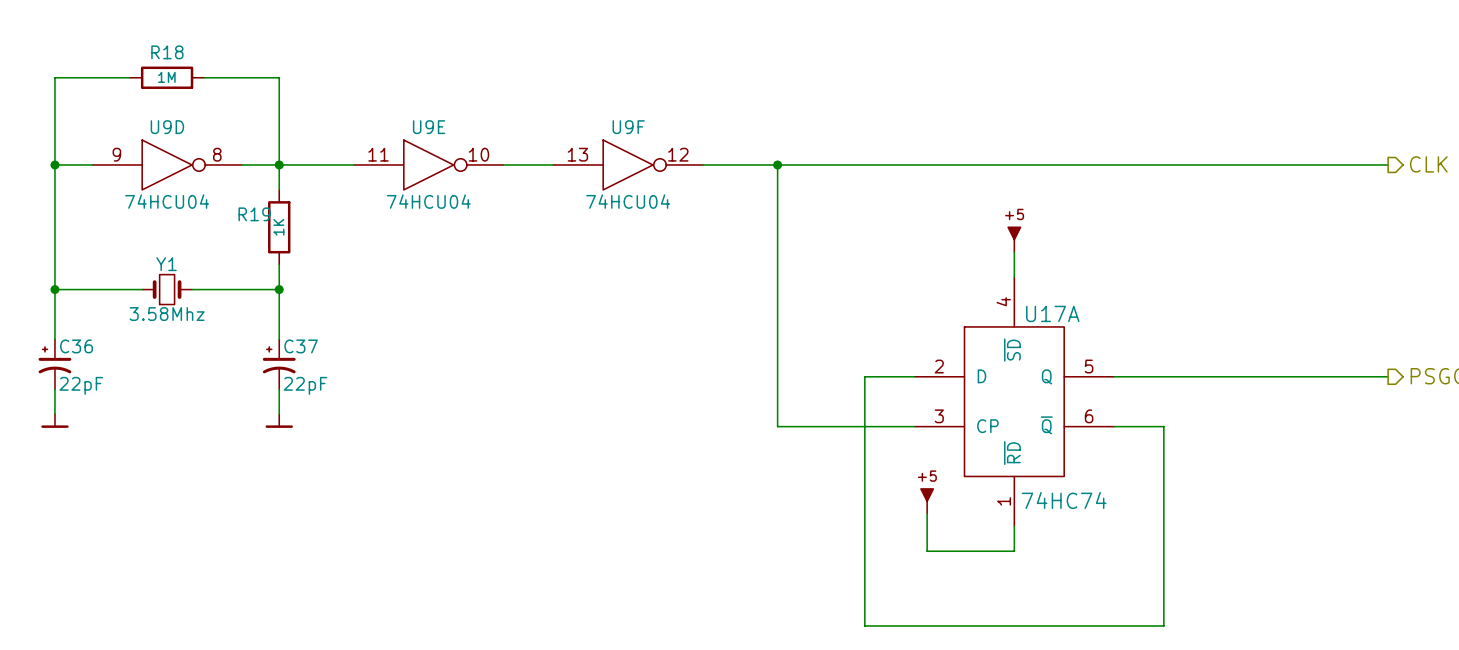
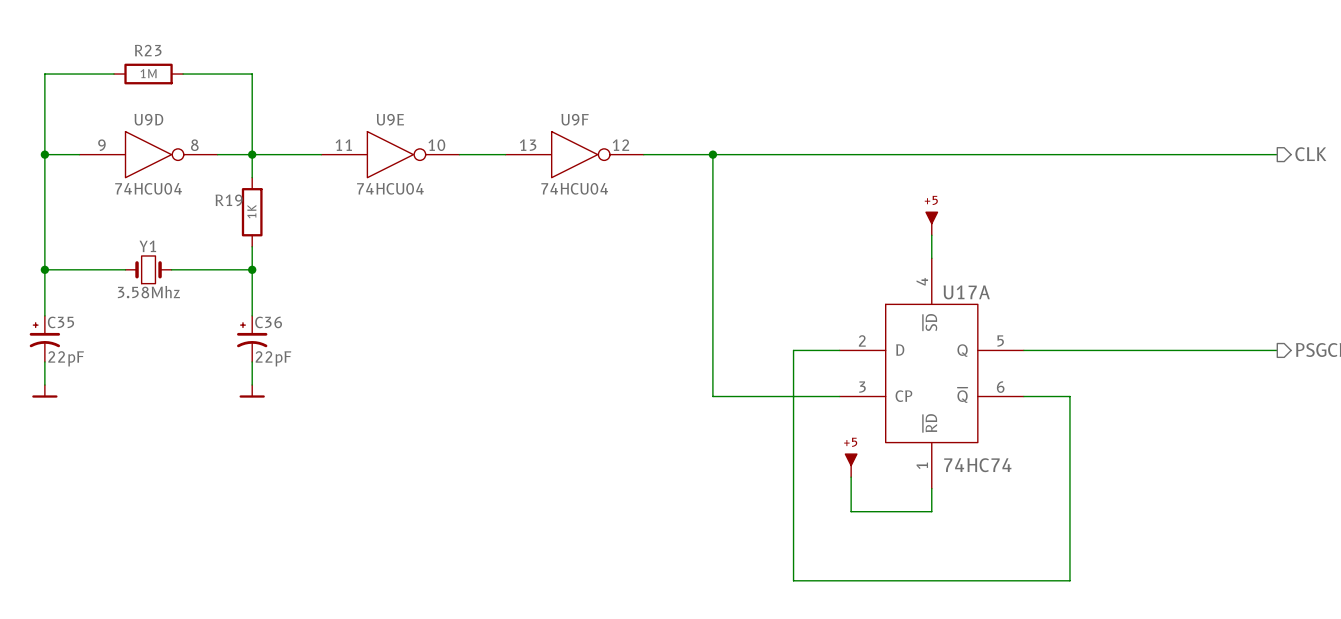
R18 name: R18 (167, 52) -> R23 (148, 50)
C36 name: C36 (76, 346) -> C35 (60, 322)
C37 name: C37 (301, 346) -> C36 (268, 322)

